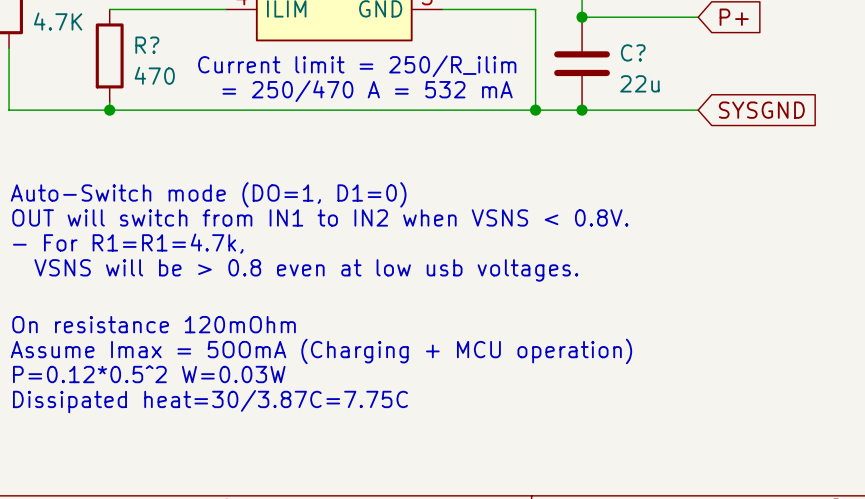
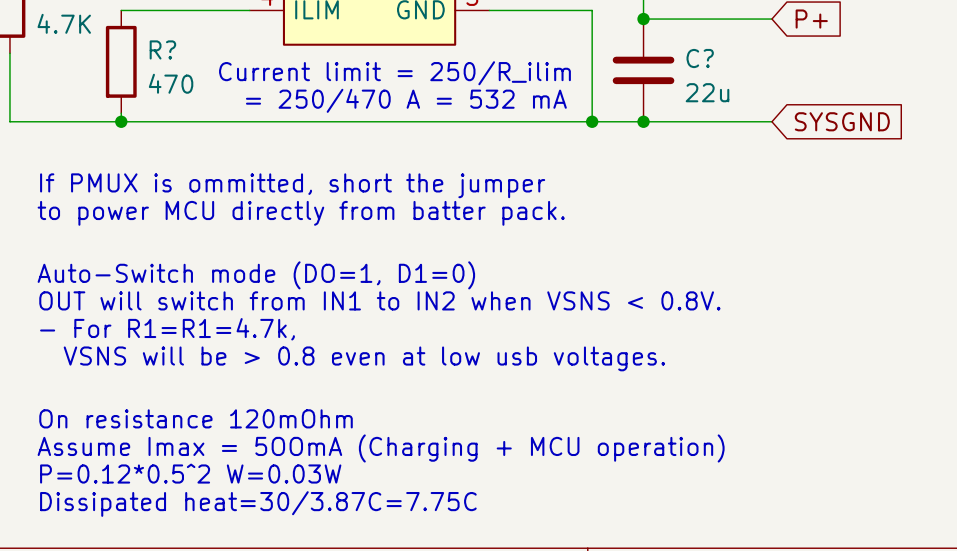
text: none -> If PMUX is ommitted, short the jumper (292, 185)
text: none -> to power MCU directly from batter pack. (301, 213)
text position: Auto-Switch mode (DO=1, D1=0) (208, 194) -> Auto-Switch mode (DO=1, D1=0) (256, 275)
text position: OUT will switch from IN1 to IN2 when VSNS < 0.8V. (320, 217) -> OUT will switch from IN1 to IN2 when VSNS < 0.8V. (379, 300)
text position: - For R1=R1=4.7k, (128, 243) -> - For R1=R1=4.7k, (167, 329)
text position: VSNS will be > 0.8 even at low usb voltages. (306, 270) -> VSNS will be > 0.8 even at low usb voltages. (364, 358)
text position: On resistance 120mOhm (154, 324) -> On resistance 120mOhm (196, 418)
text position: Assume Imax = 5OOmA (Charging + MCU operation) (321, 351) -> Assume Imax = 5OOmA (Charging + MCU operation) (381, 448)
text position: P=0.12*0.5^2 W=0.03W (149, 374) -> P=0.12*0.5^2 W=0.03W (190, 473)
text position: Dissipated heat=30/3.87C=7.75C (210, 401) -> Dissipated heat=30/3.87C=7.75C (258, 504)

